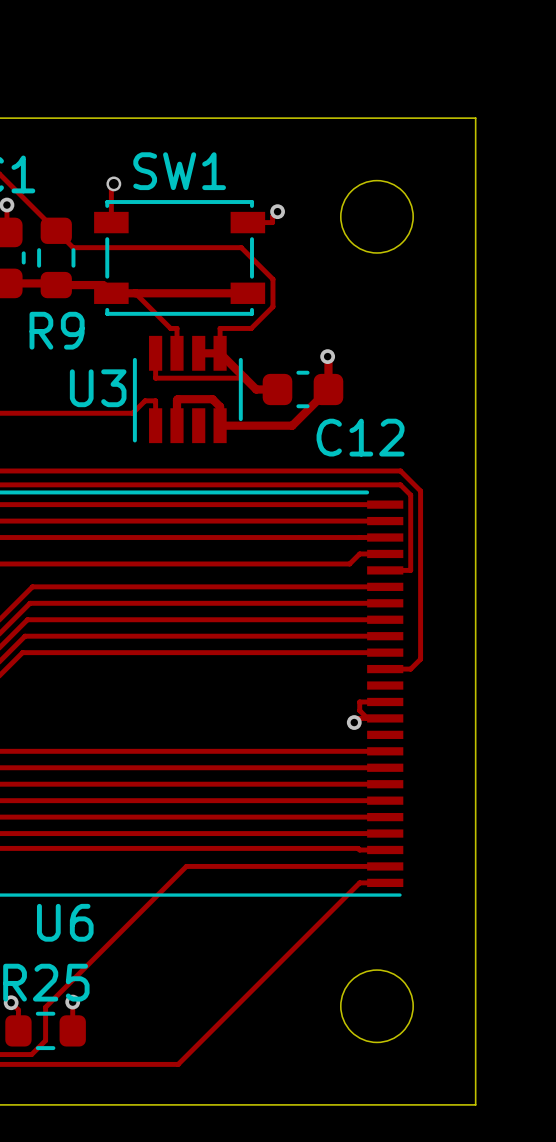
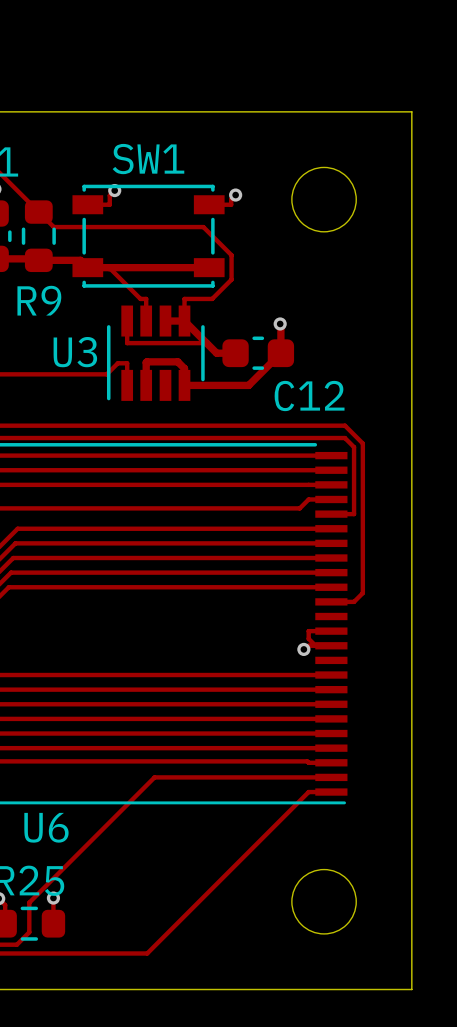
track: (113, 183) (111, 186) (111, 222) -> (114, 190) (109, 195) (109, 204) (87, 204)
via: (113, 183) -> none
via: none -> (114, 190)

